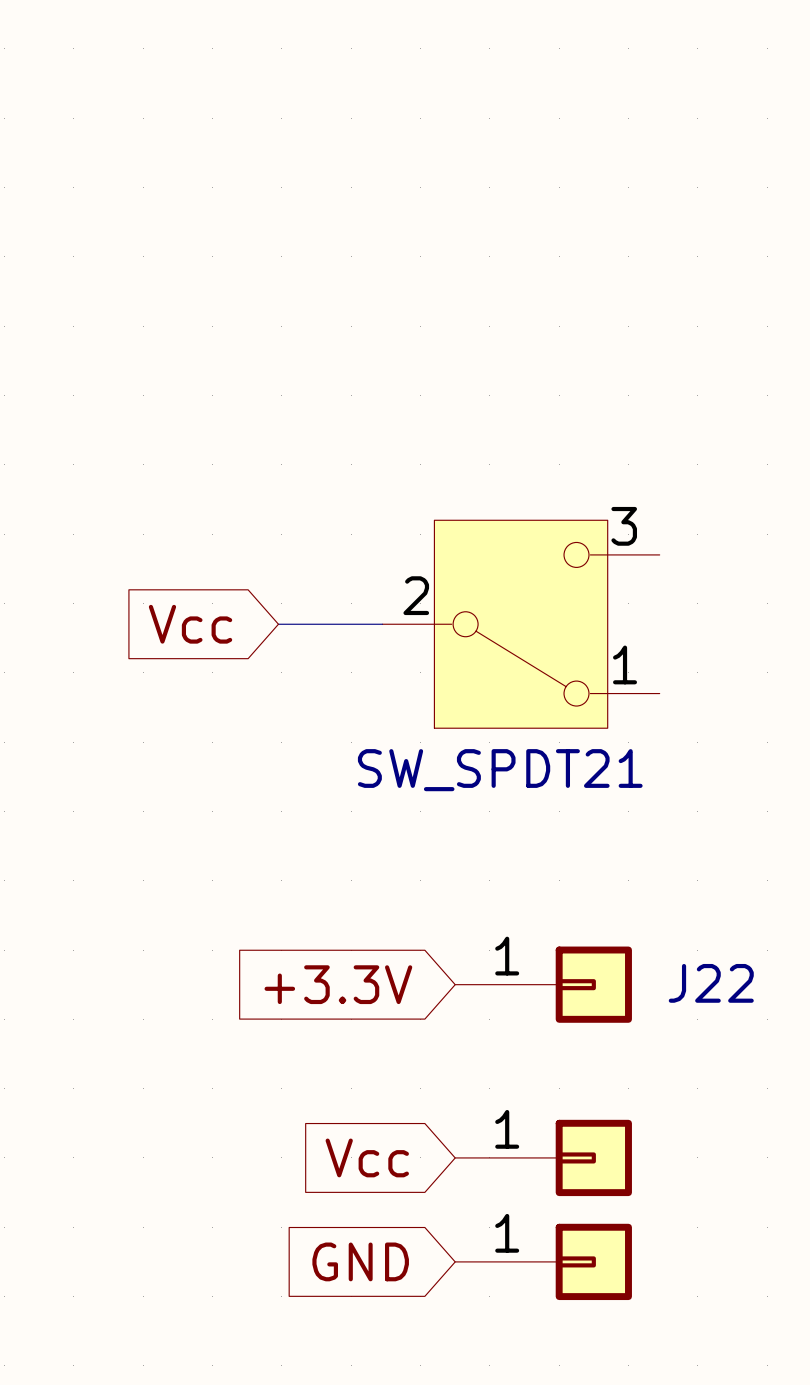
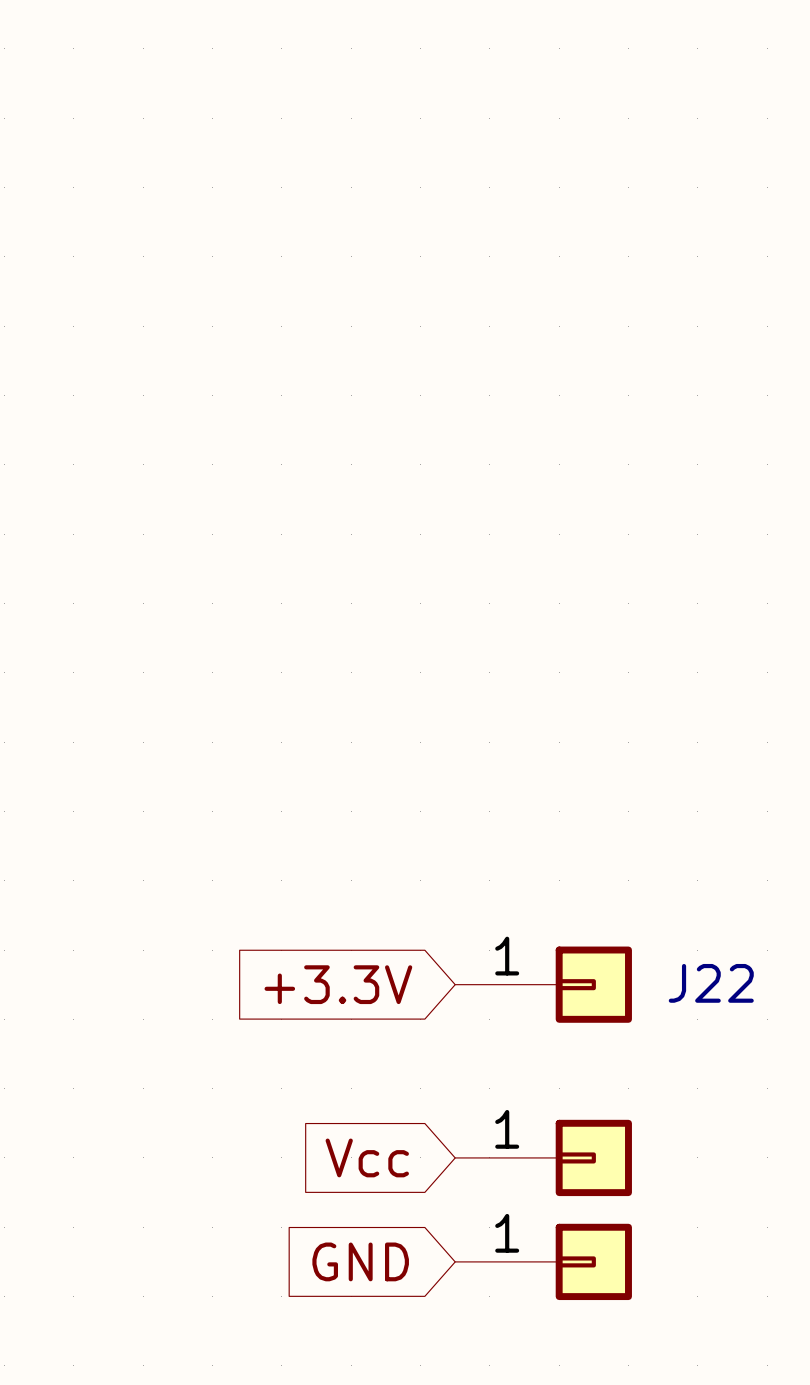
global label: Vcc (190, 624) -> none
wire: (278, 624) (382, 624) -> none
SW_SPDT21: (521, 624) -> none

